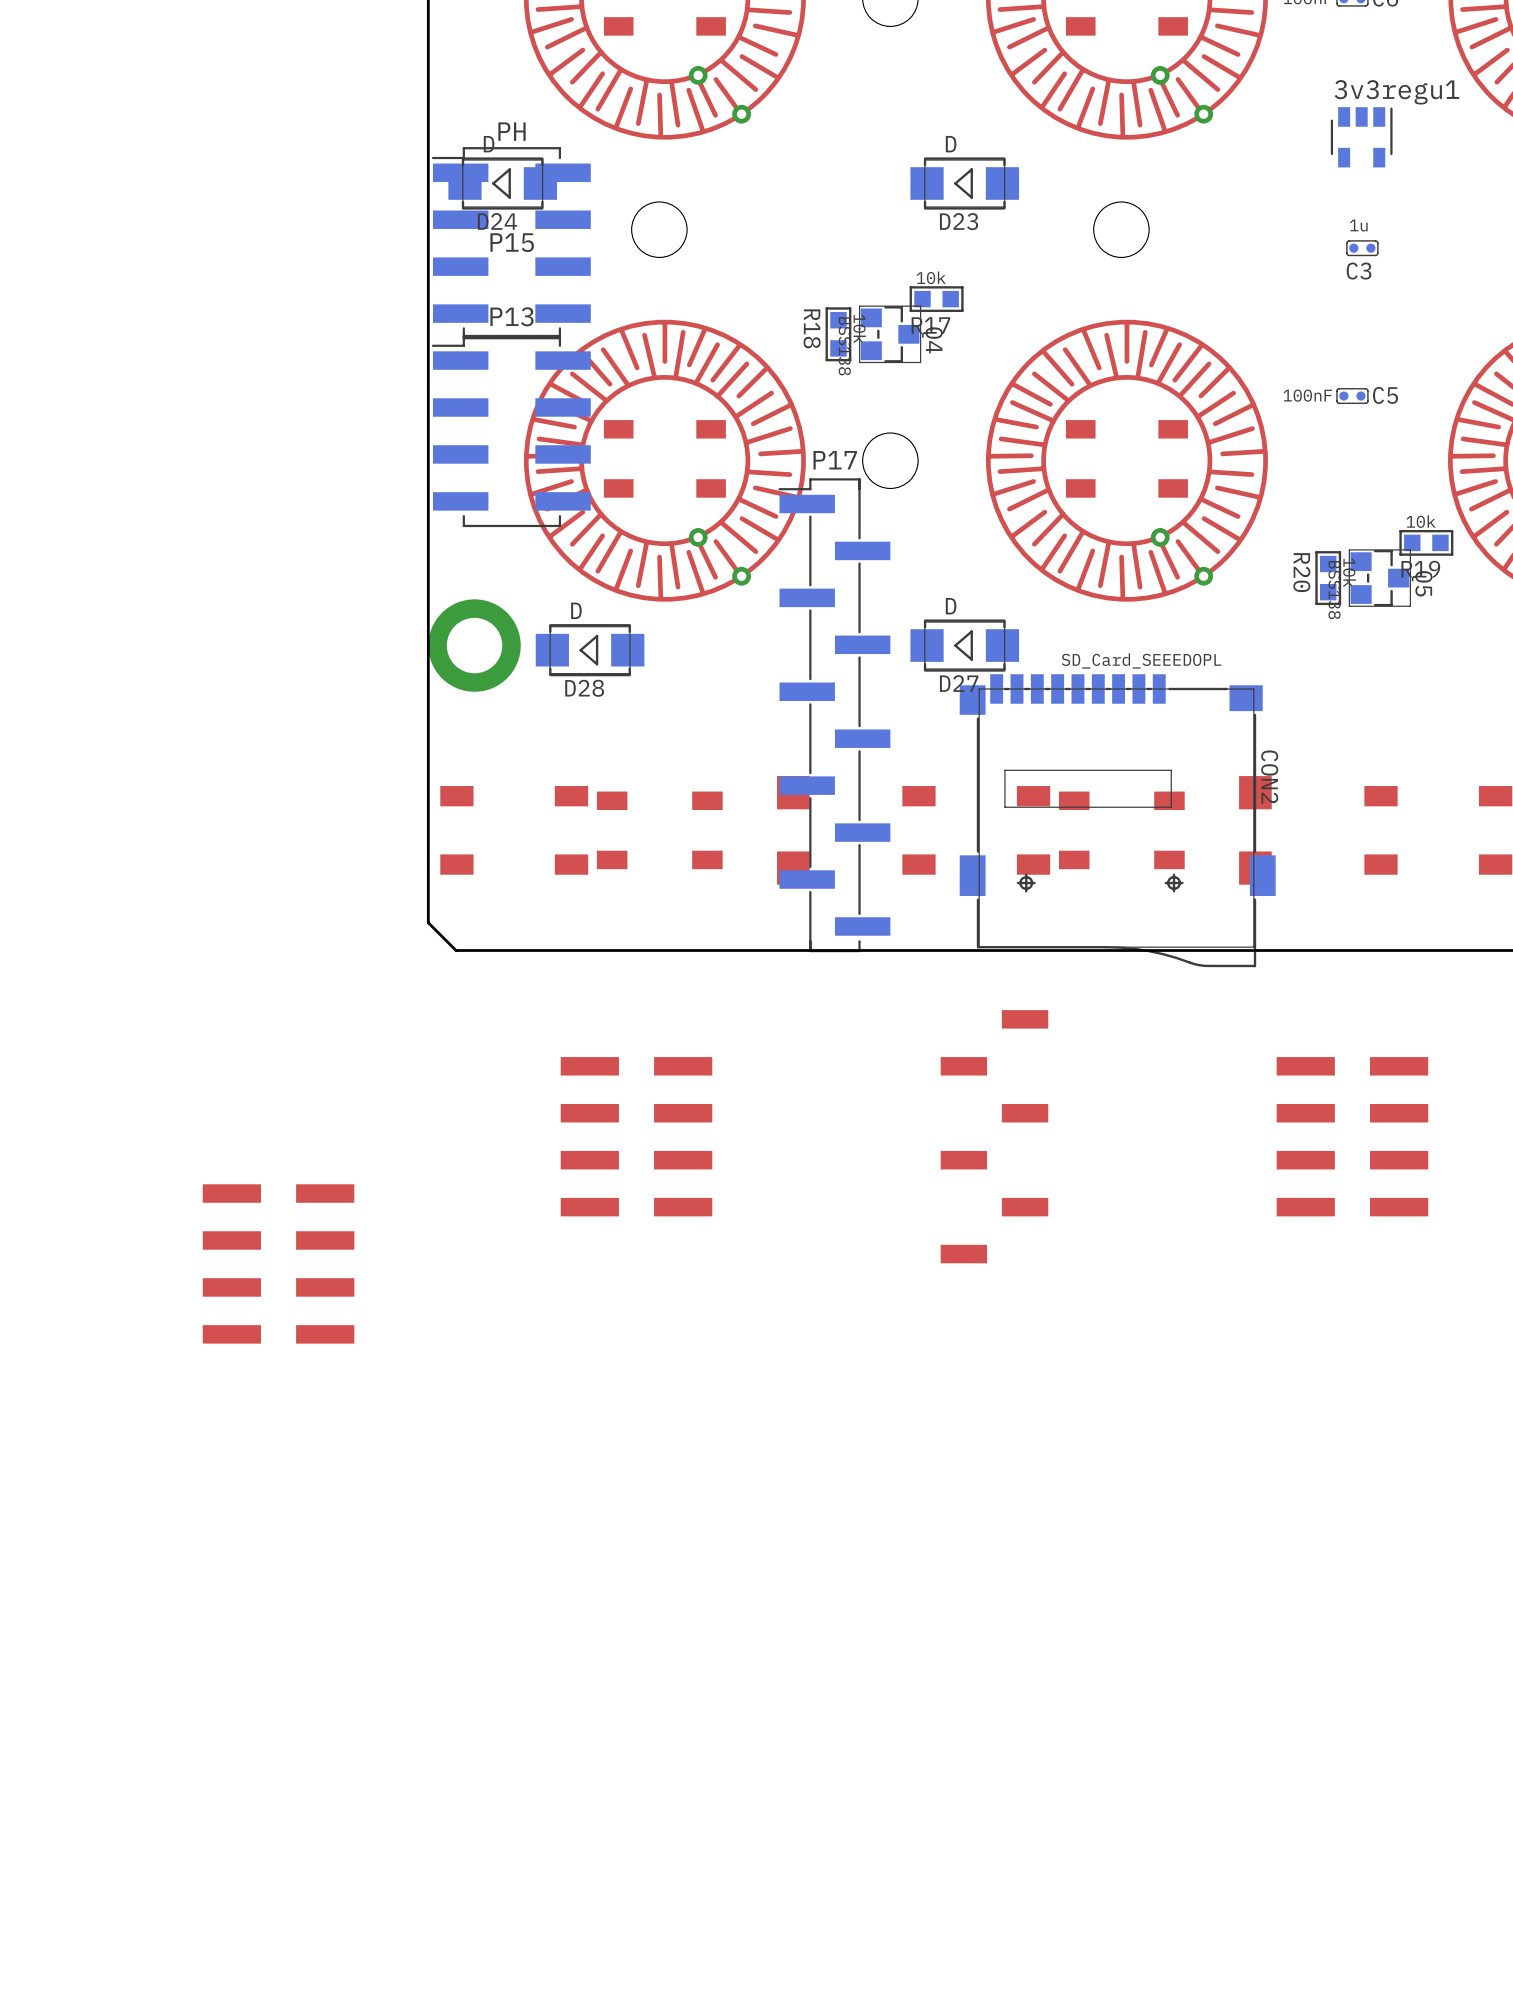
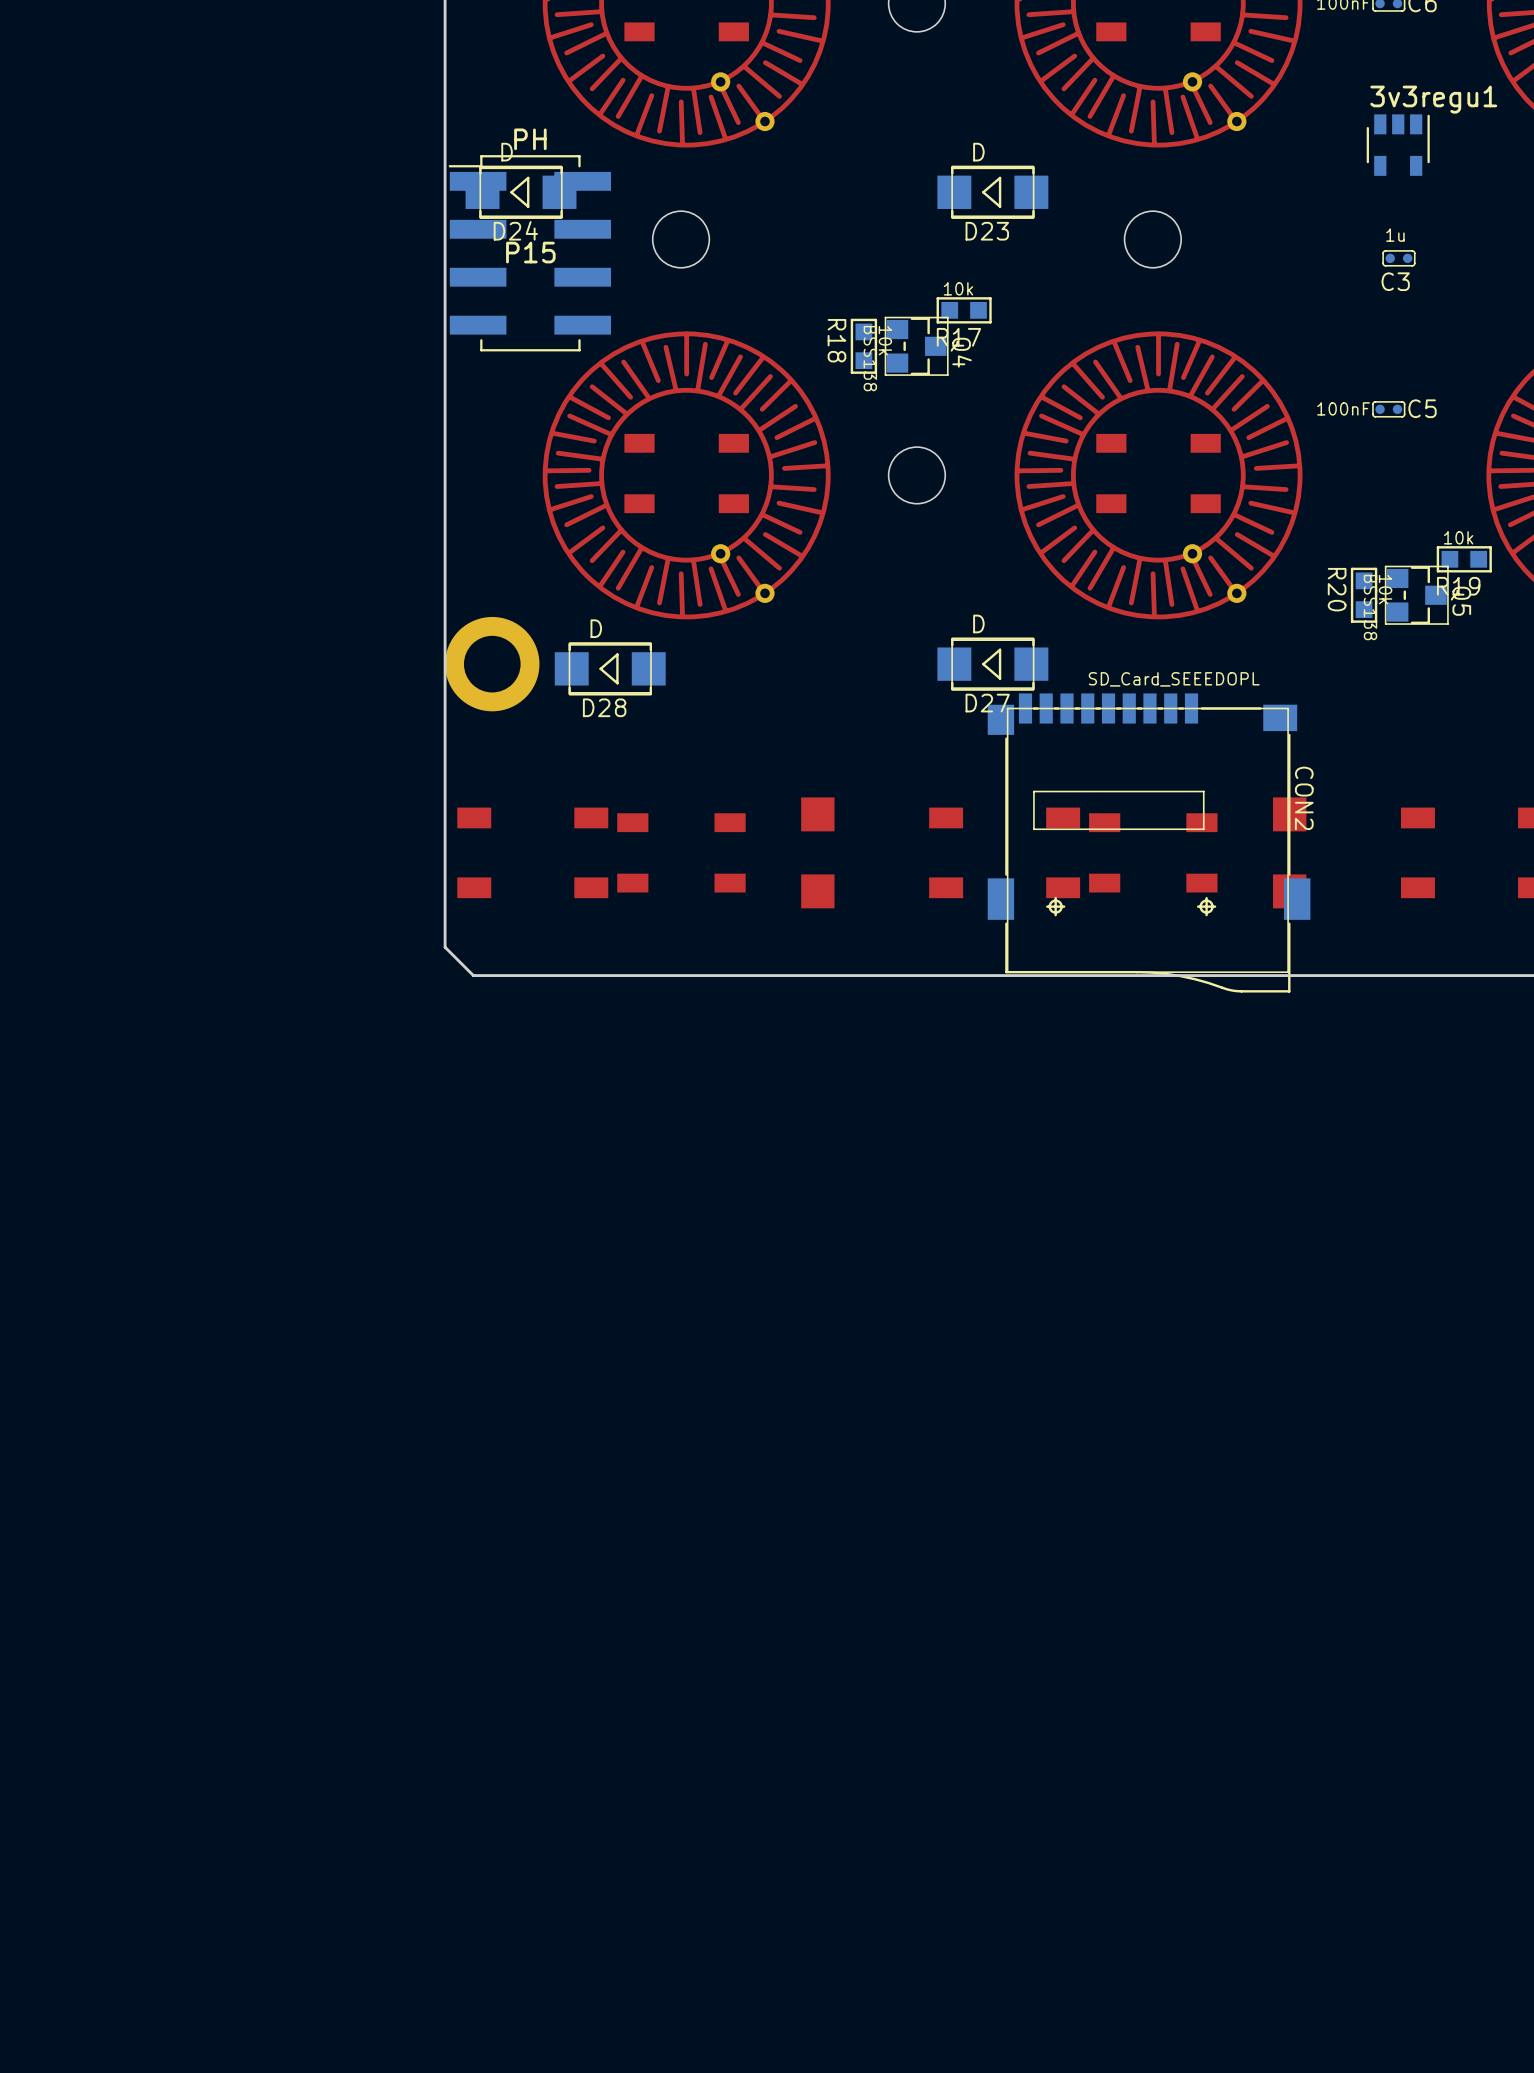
P13: (511, 430) -> none
P17: (834, 715) -> none
part: (636, 1136) -> none
part: (994, 1136) -> none
part: (1352, 1136) -> none
part: (278, 1263) -> none

